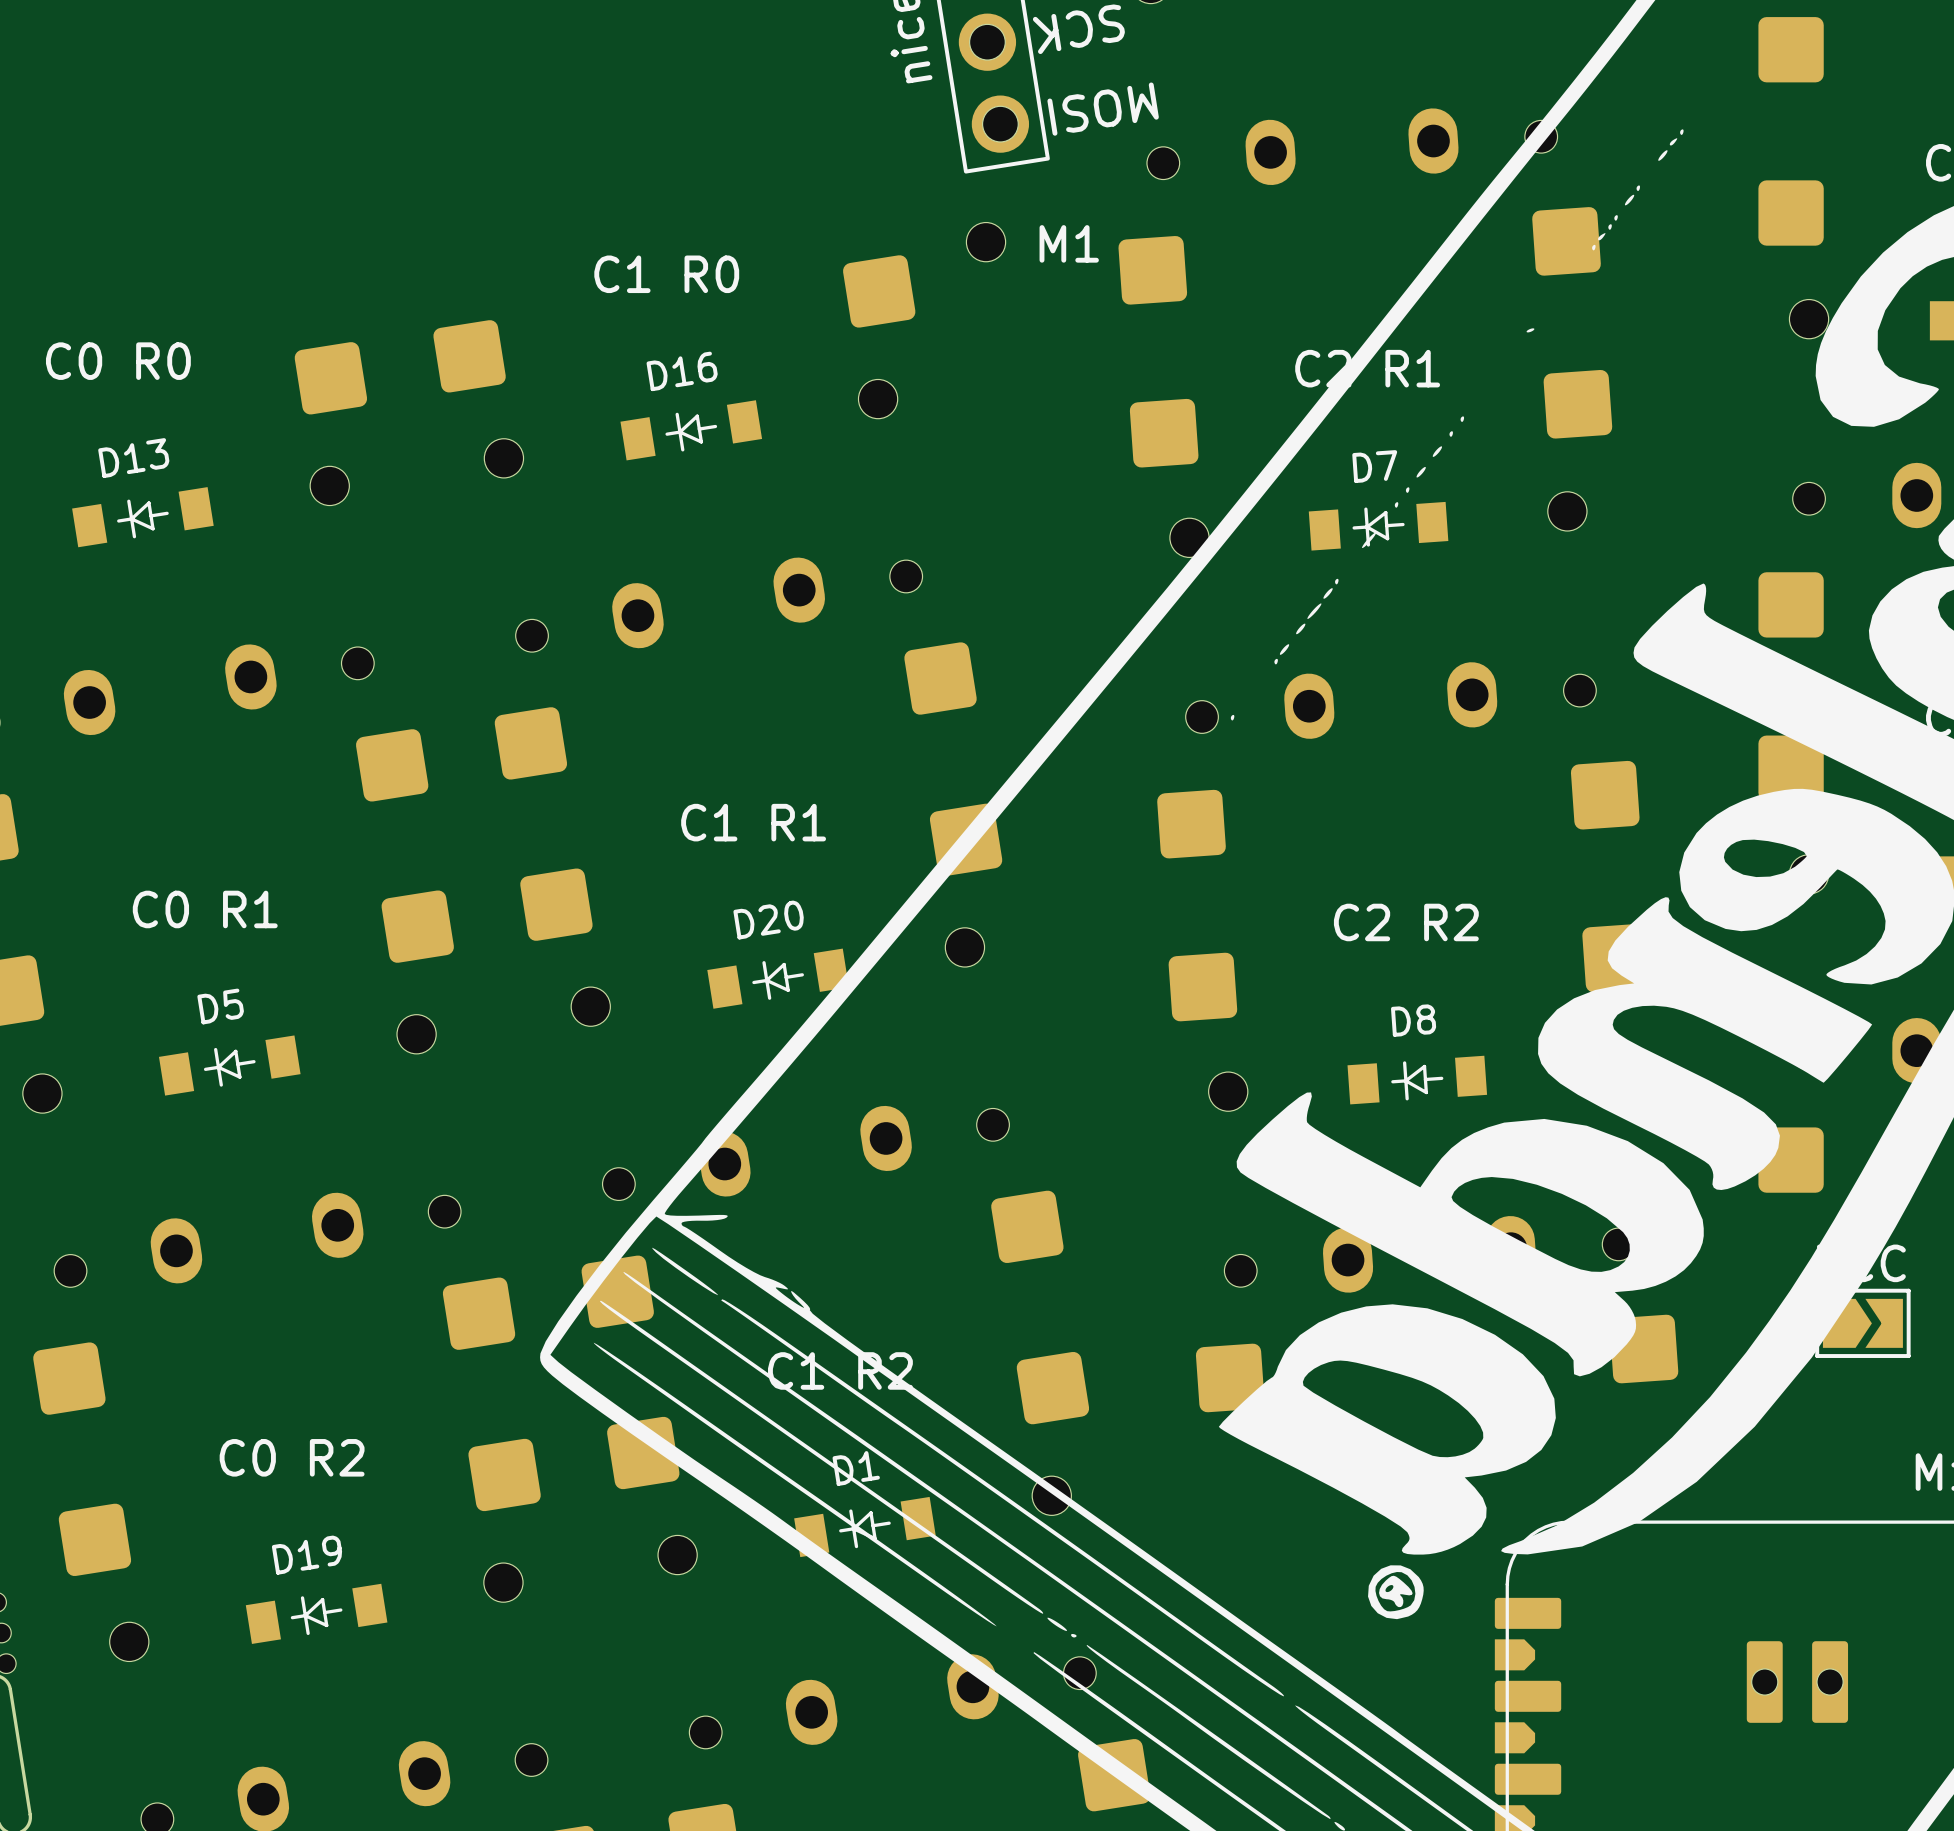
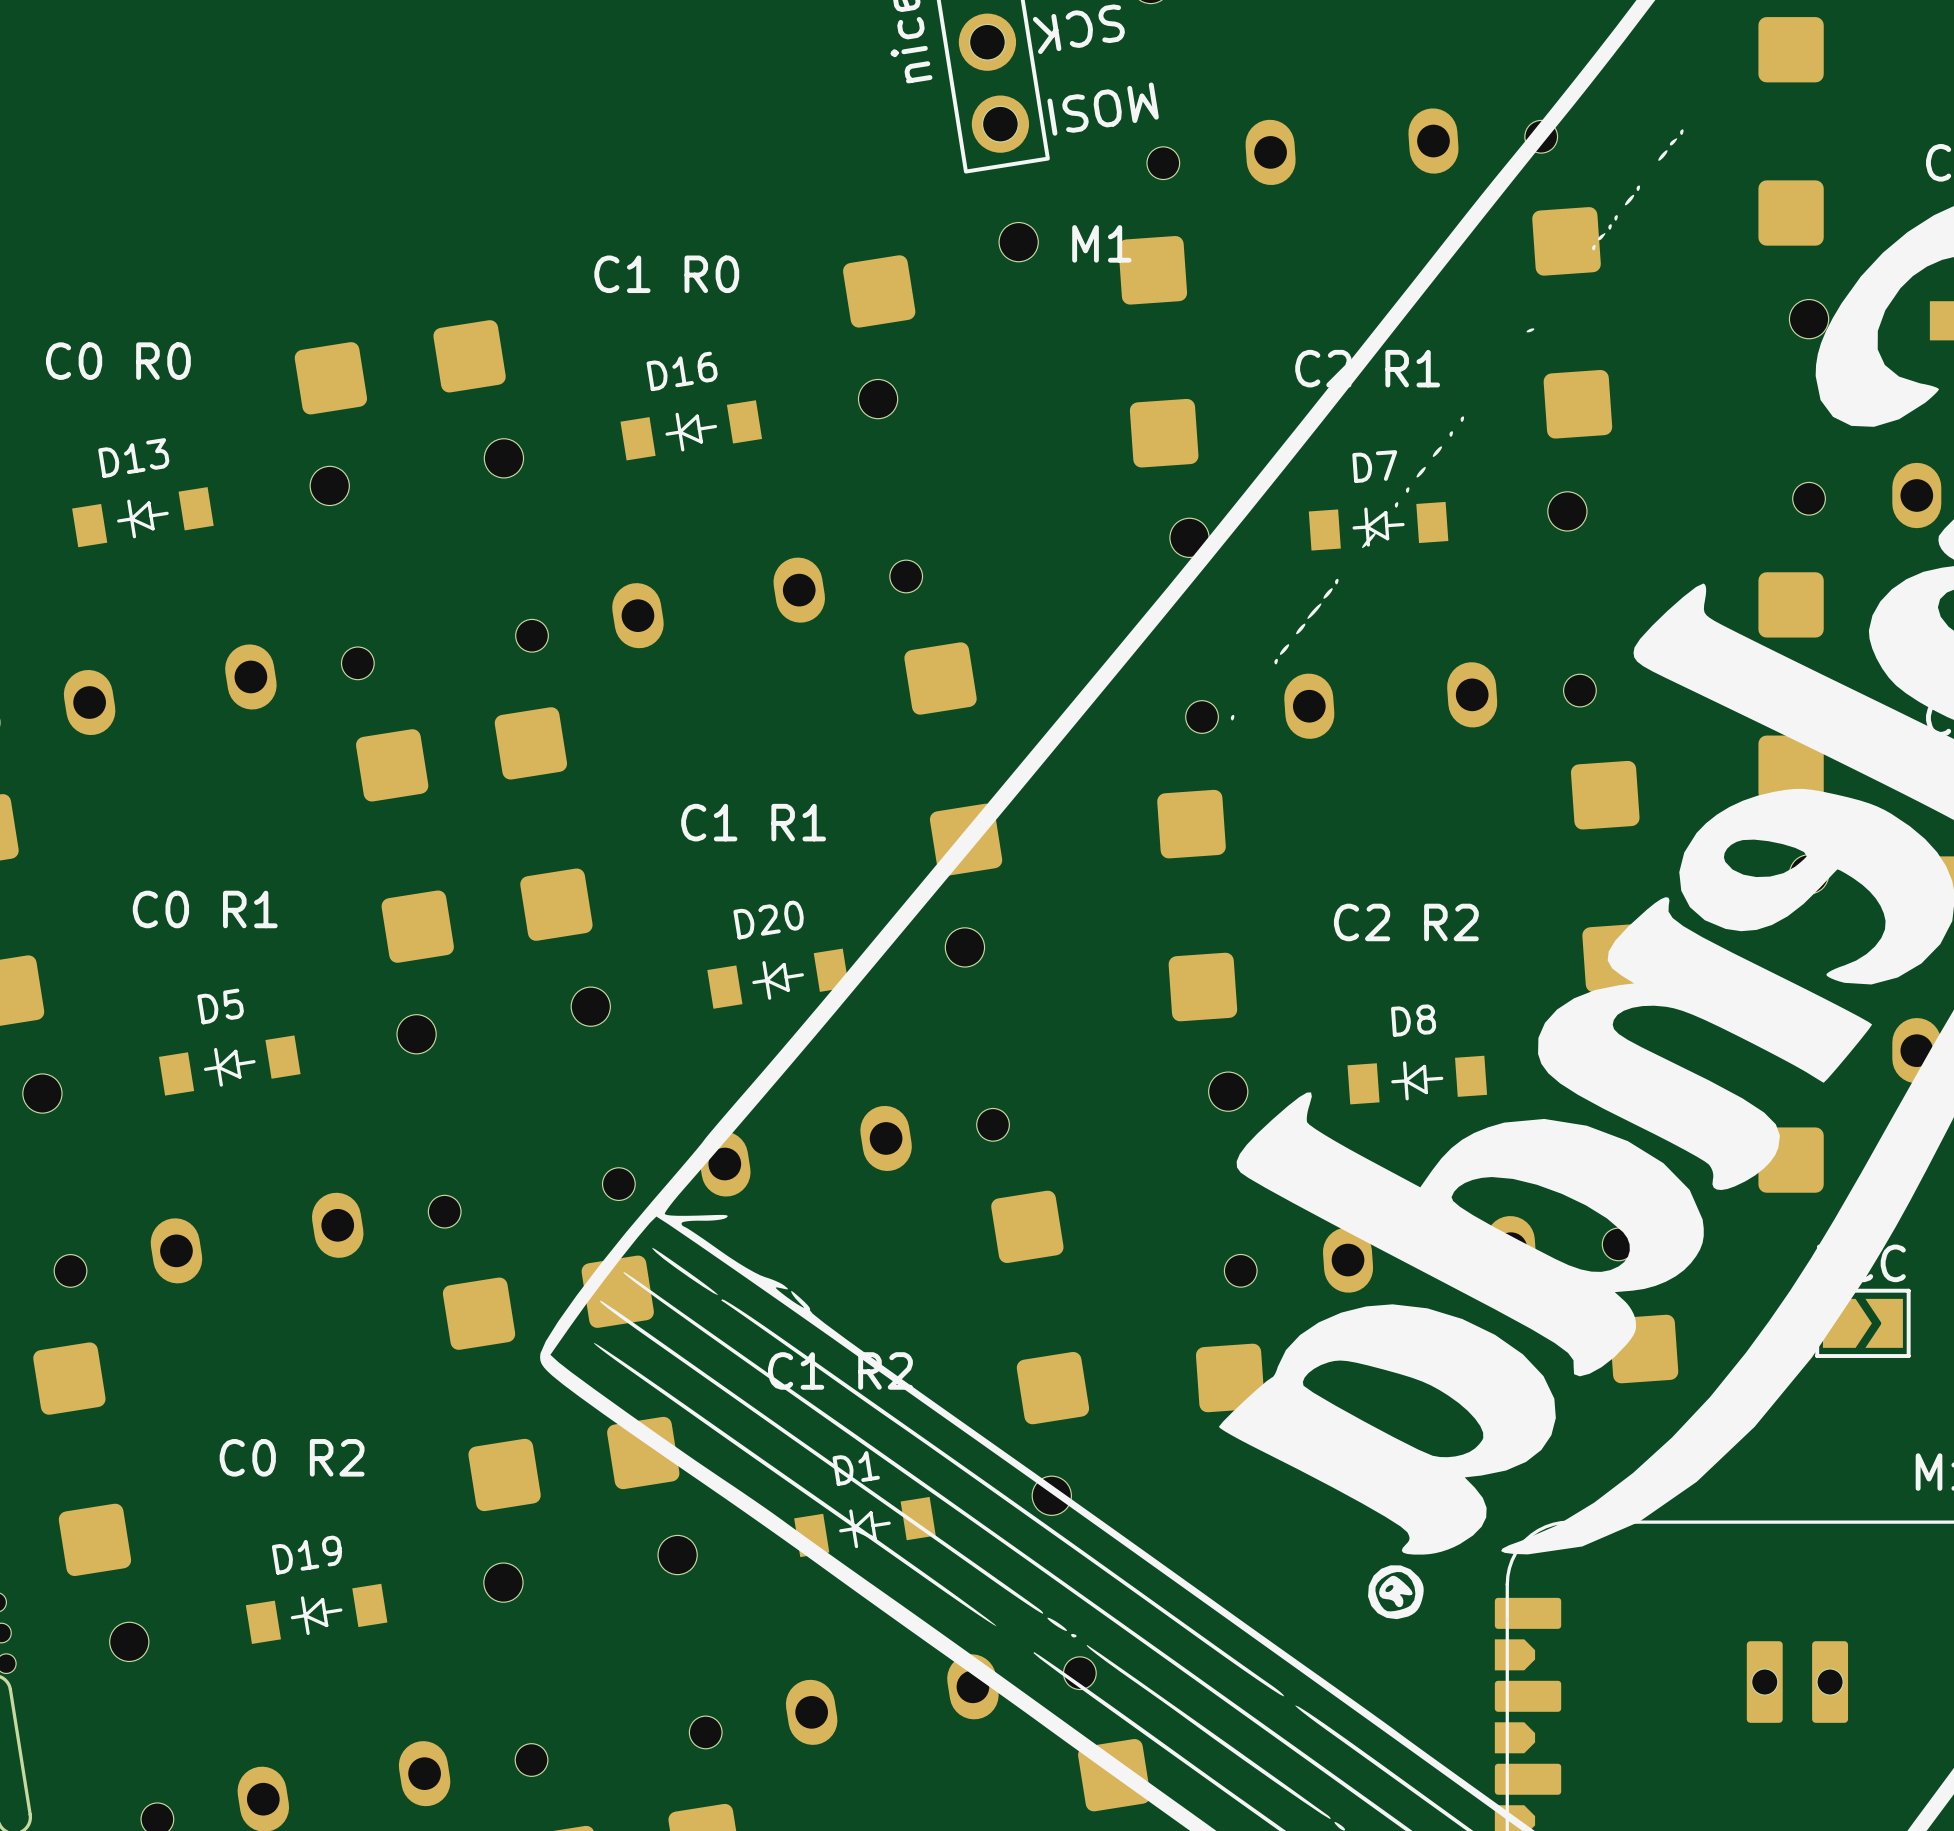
M1 position: (986, 242) -> (1018, 242)

